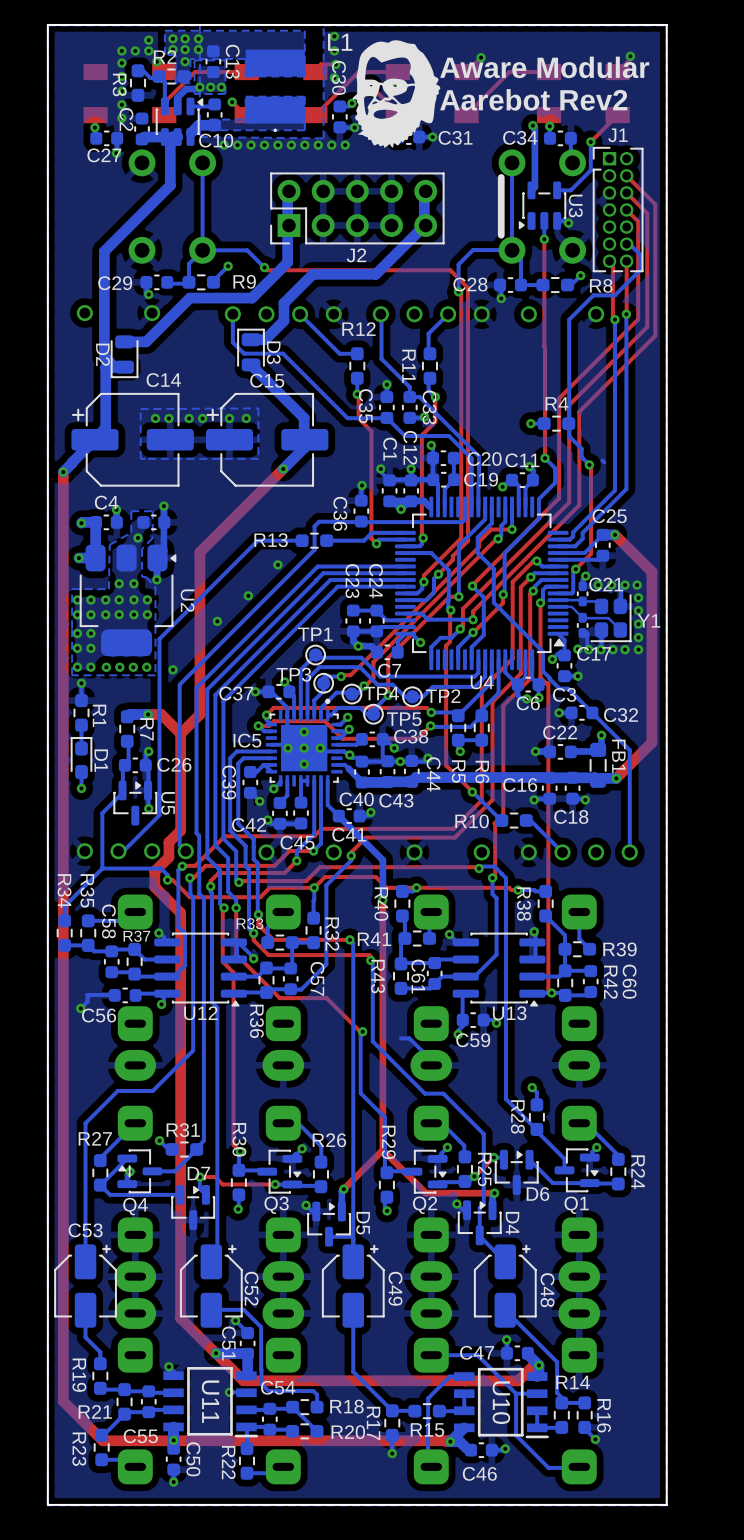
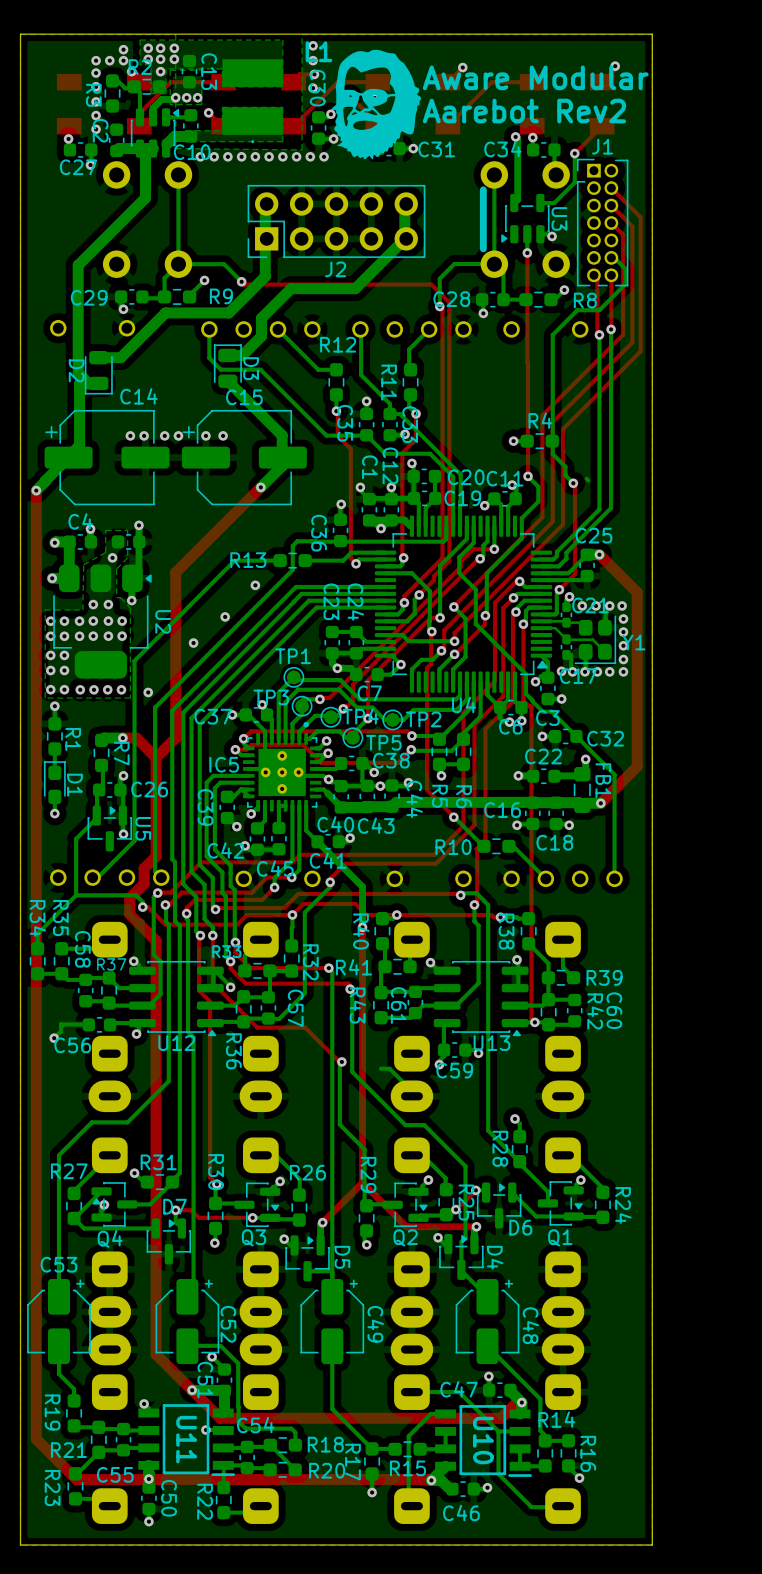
bottom zone outline: (258, 408) (140, 409) (140, 458) (258, 458) (258, 408) -> none
bottom track: (405, 633) (398, 641) (398, 651) -> none
bottom track: none -> (400, 664) (390, 674) (377, 674)

